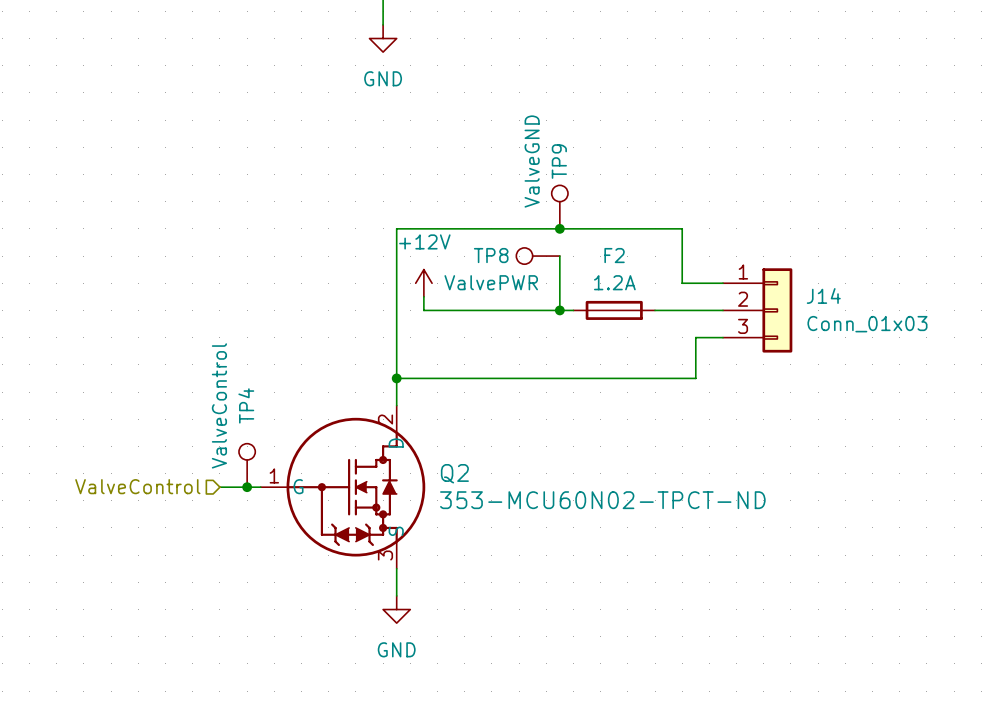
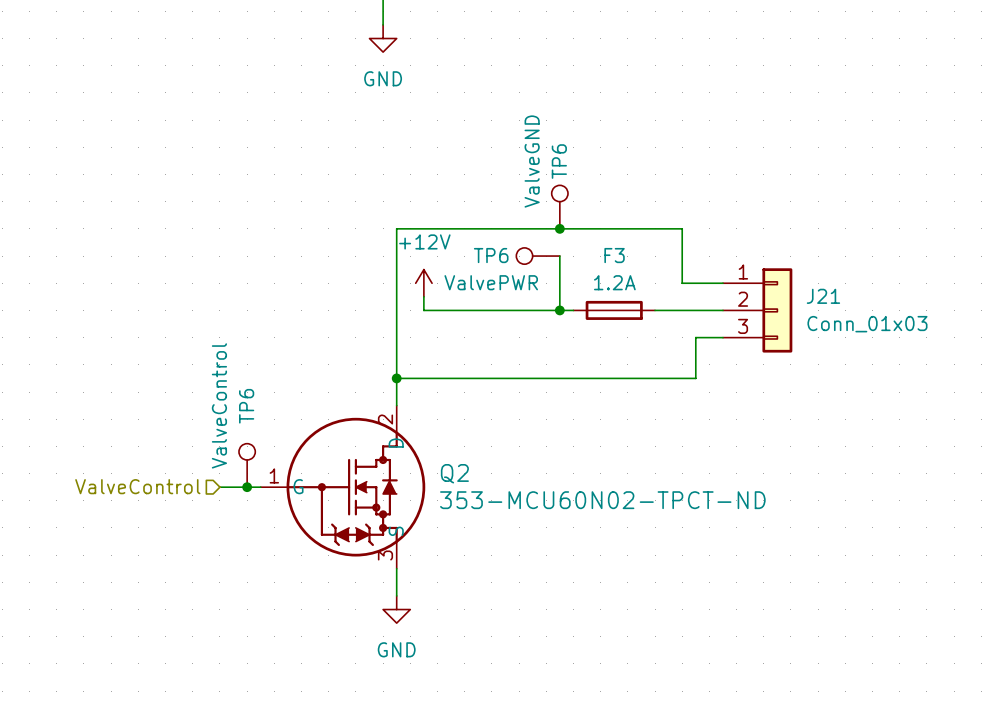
TP9 name: TP9 (559, 161) -> TP6 (559, 161)
TP8 name: TP8 (491, 255) -> TP6 (491, 255)
F2 name: F2 (614, 255) -> F3 (614, 255)
J14 name: J14 (823, 296) -> J21 (823, 296)
TP4 name: TP4 (246, 405) -> TP6 (246, 406)

